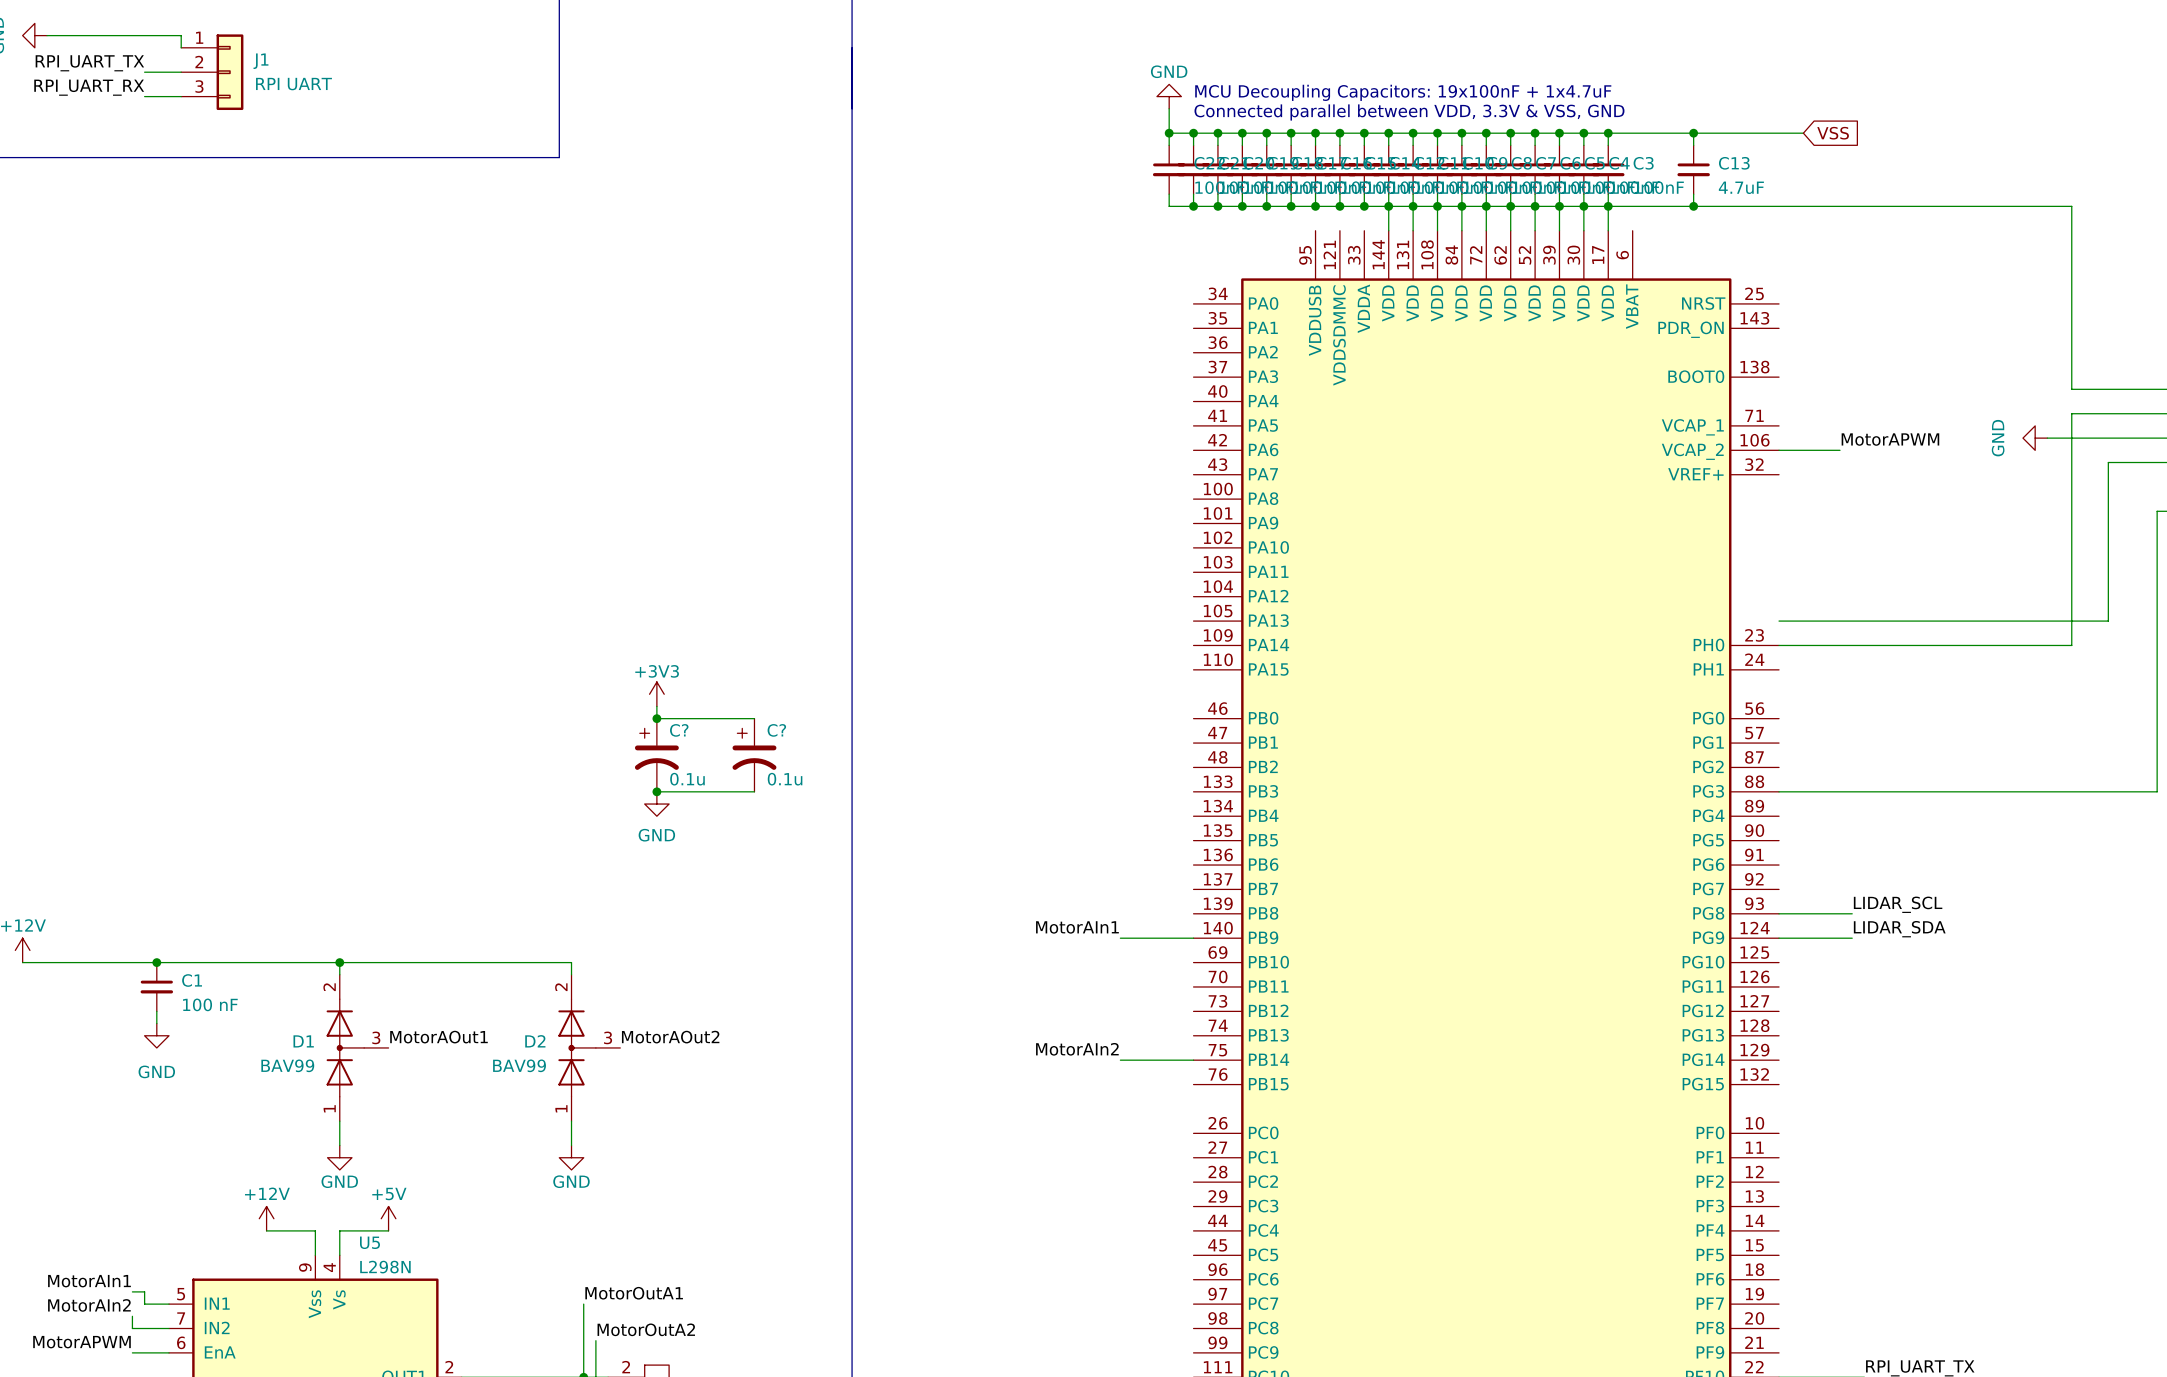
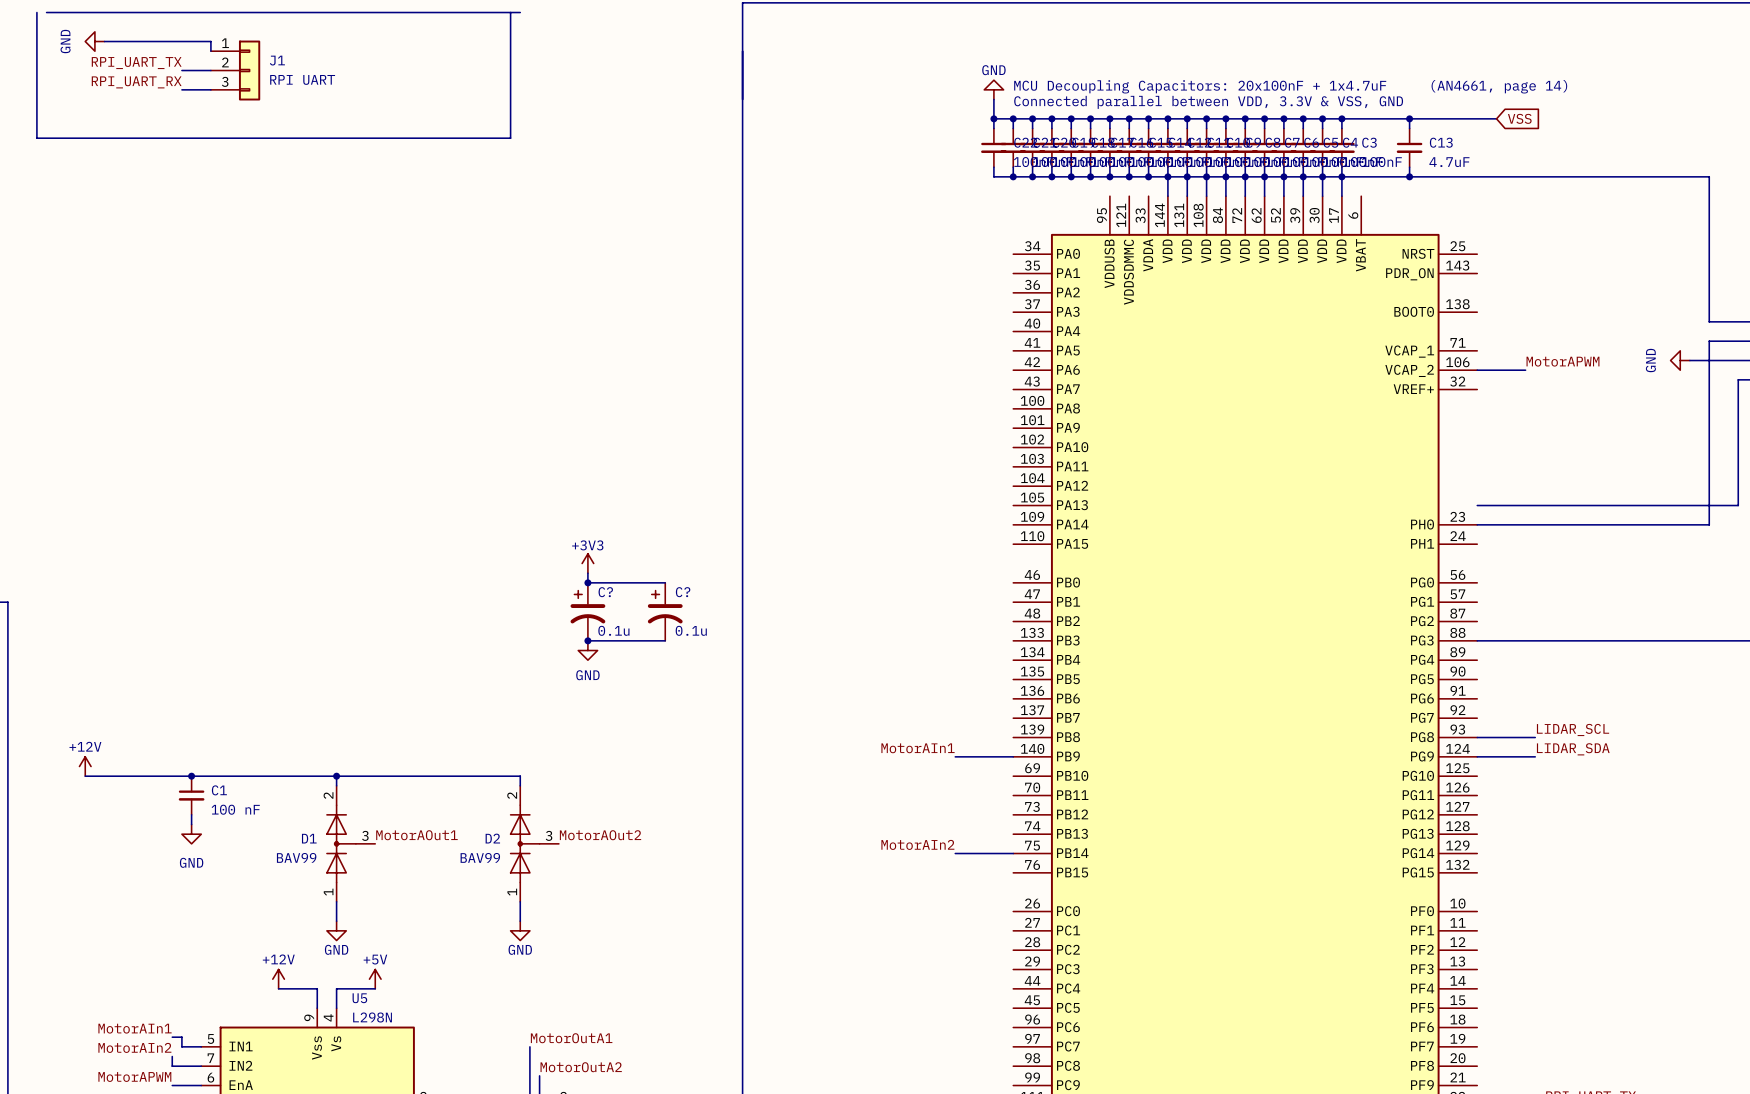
text: MCU Decoupling Capacitors: 19x100nF + 1x4.7uF (1403, 92) -> MCU Decoupling Capacitors: 20x100nF + 1x4.7uF (AN4661, page 14) (1290, 86)

